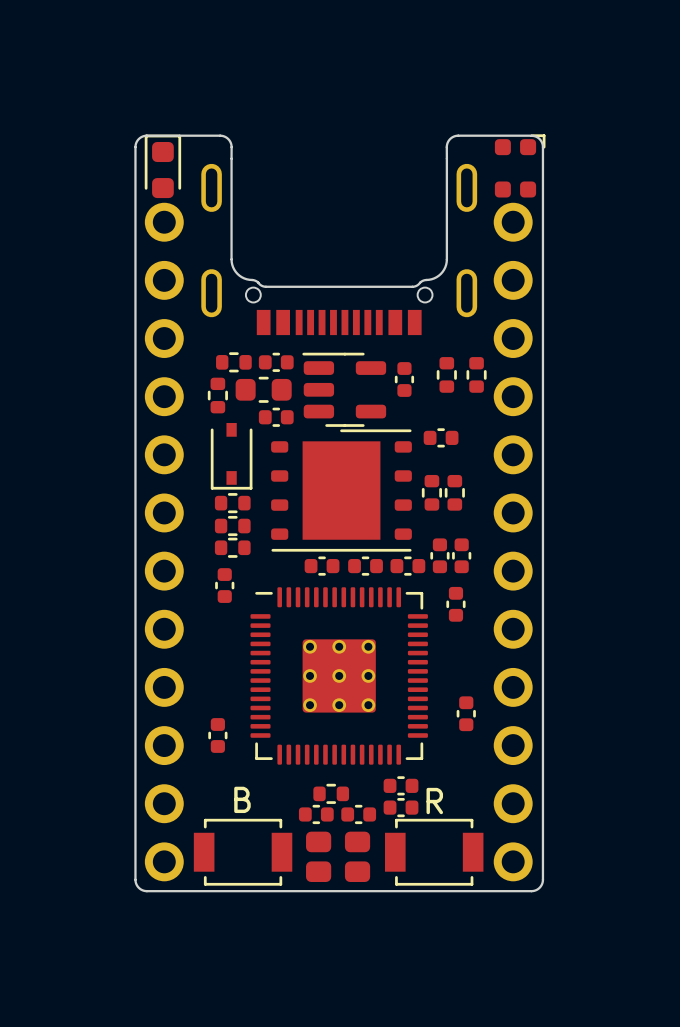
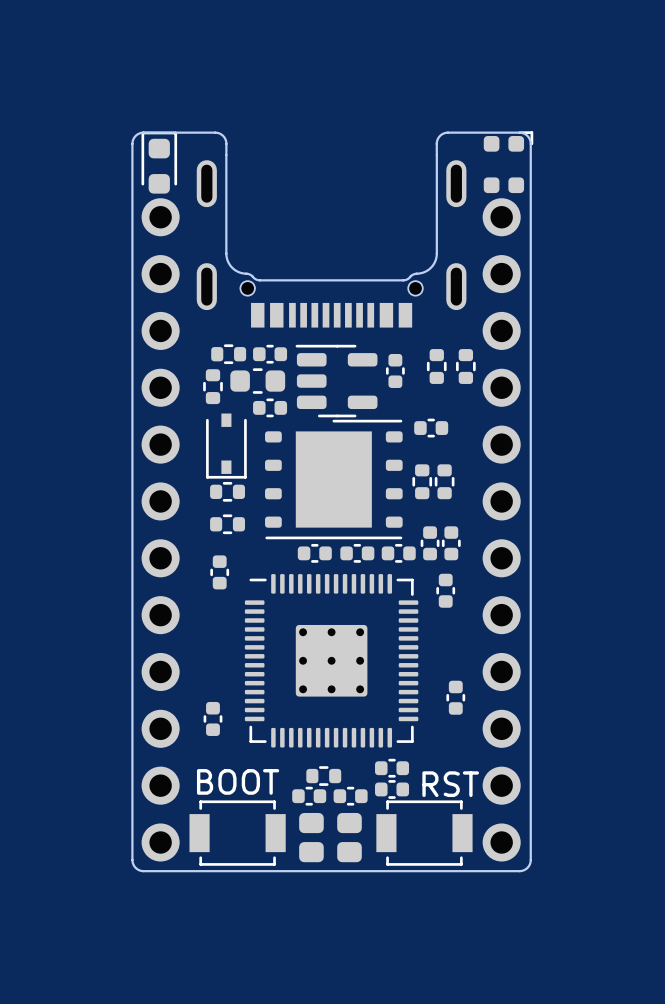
part: (232, 526) -> none
part: none -> (227, 524)
part: (232, 547) -> none
text: B (242, 799) -> BOOT (238, 781)
text: R (434, 801) -> none
text: none -> RST (450, 784)

